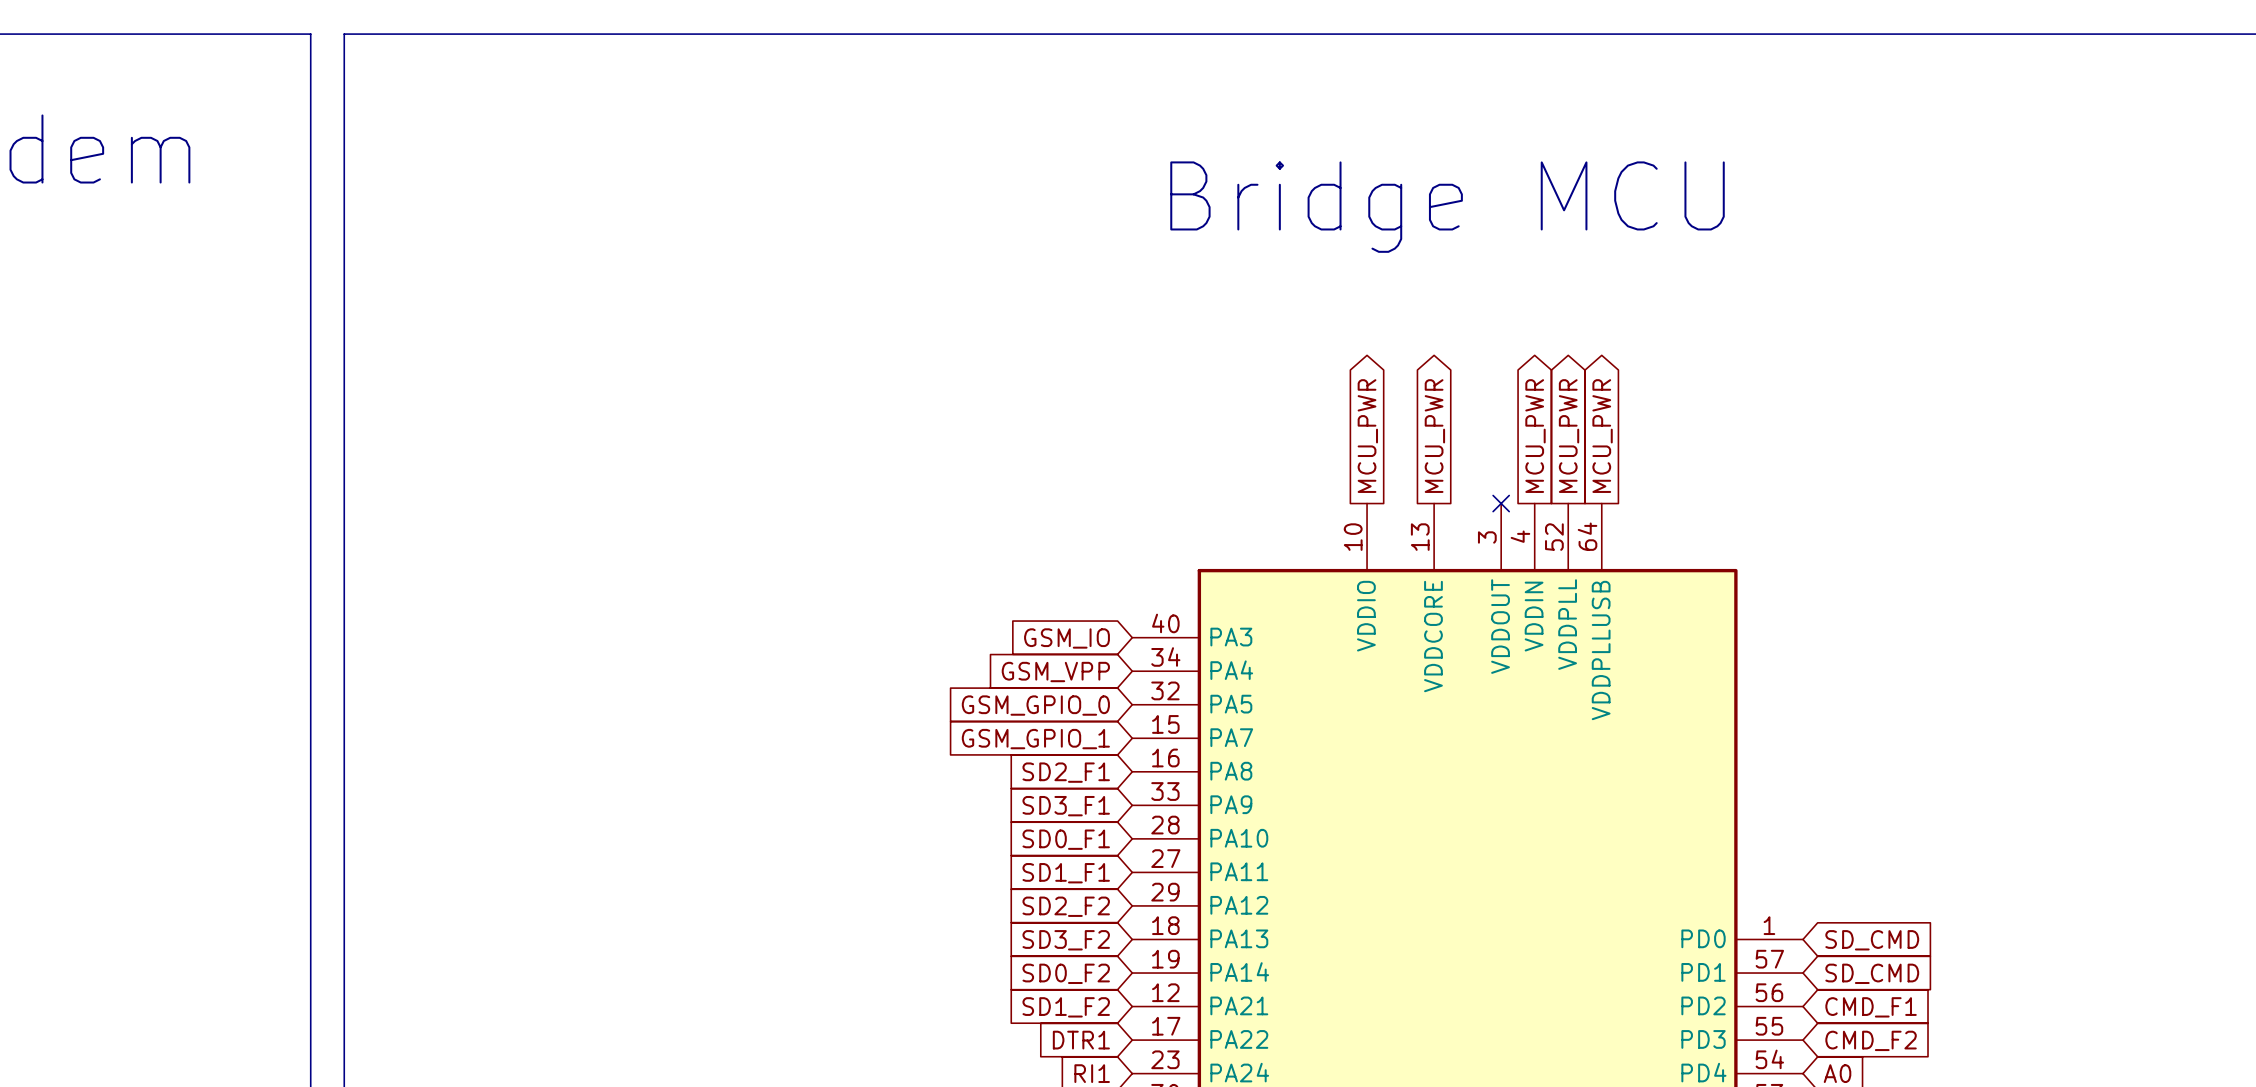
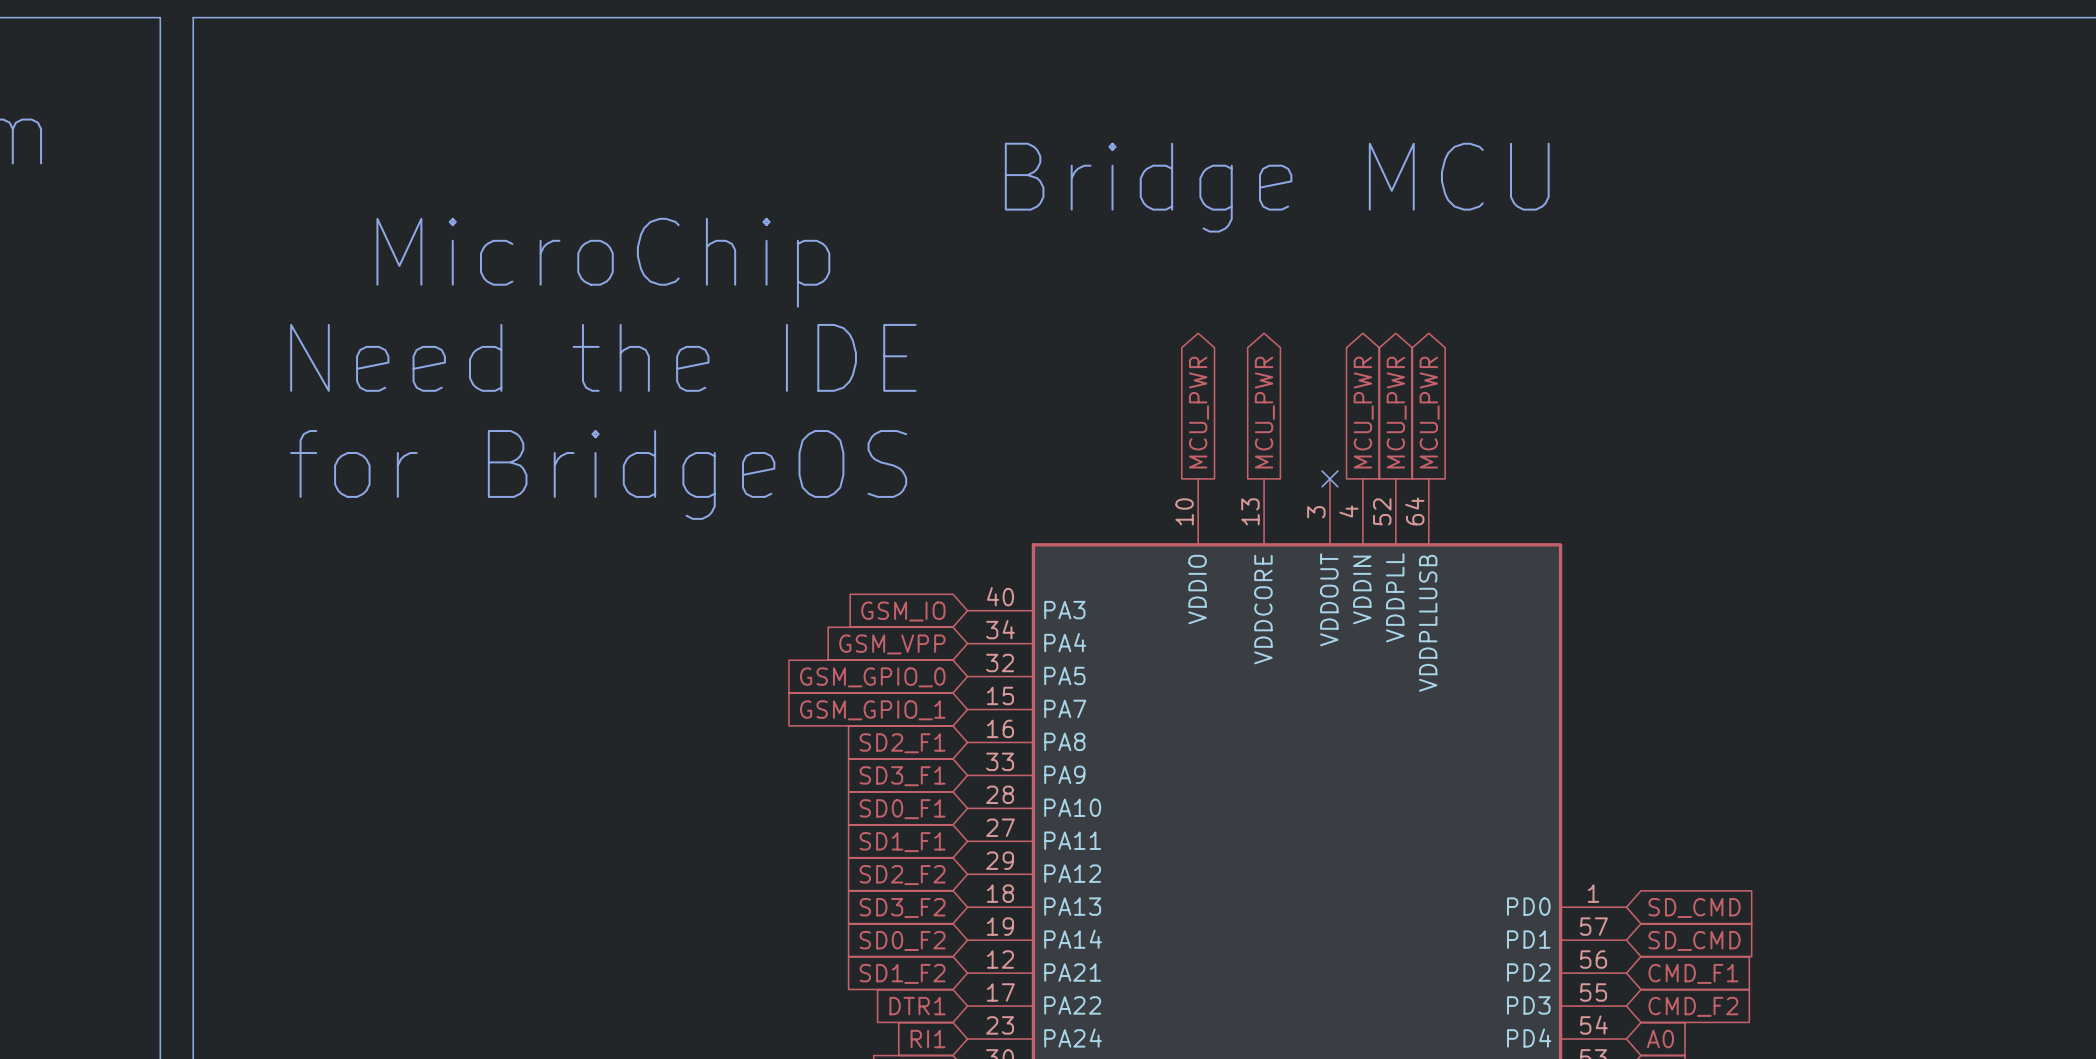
text: none -> MicroChip (603, 262)
text: none -> Need the IDE (603, 357)
text: none -> for BridgeOS (598, 474)

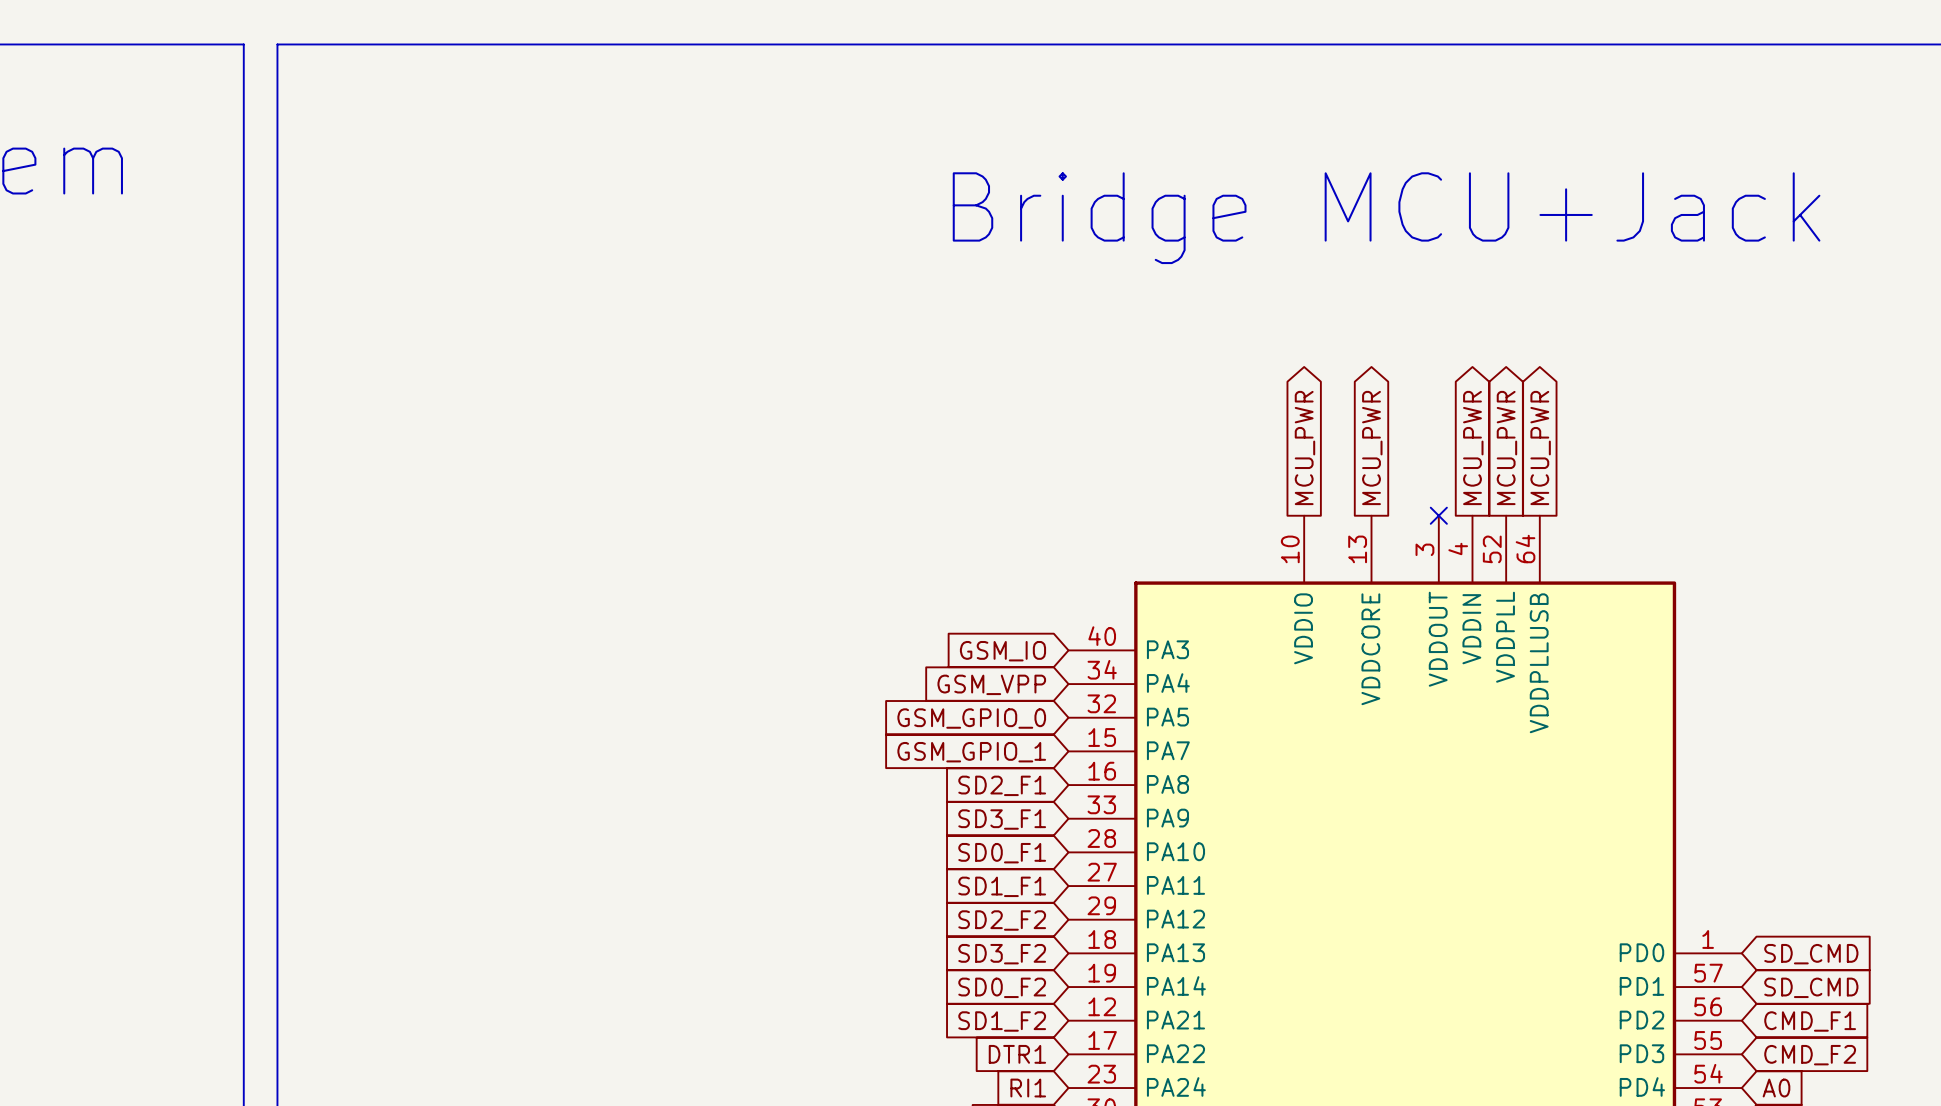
text: Bridge MCU (1277, 187) -> Bridge MCU+Jack (1386, 218)
text: MicroChip (603, 262) -> none
text: Need the IDE (603, 357) -> none
text: for BridgeOS (598, 474) -> none

